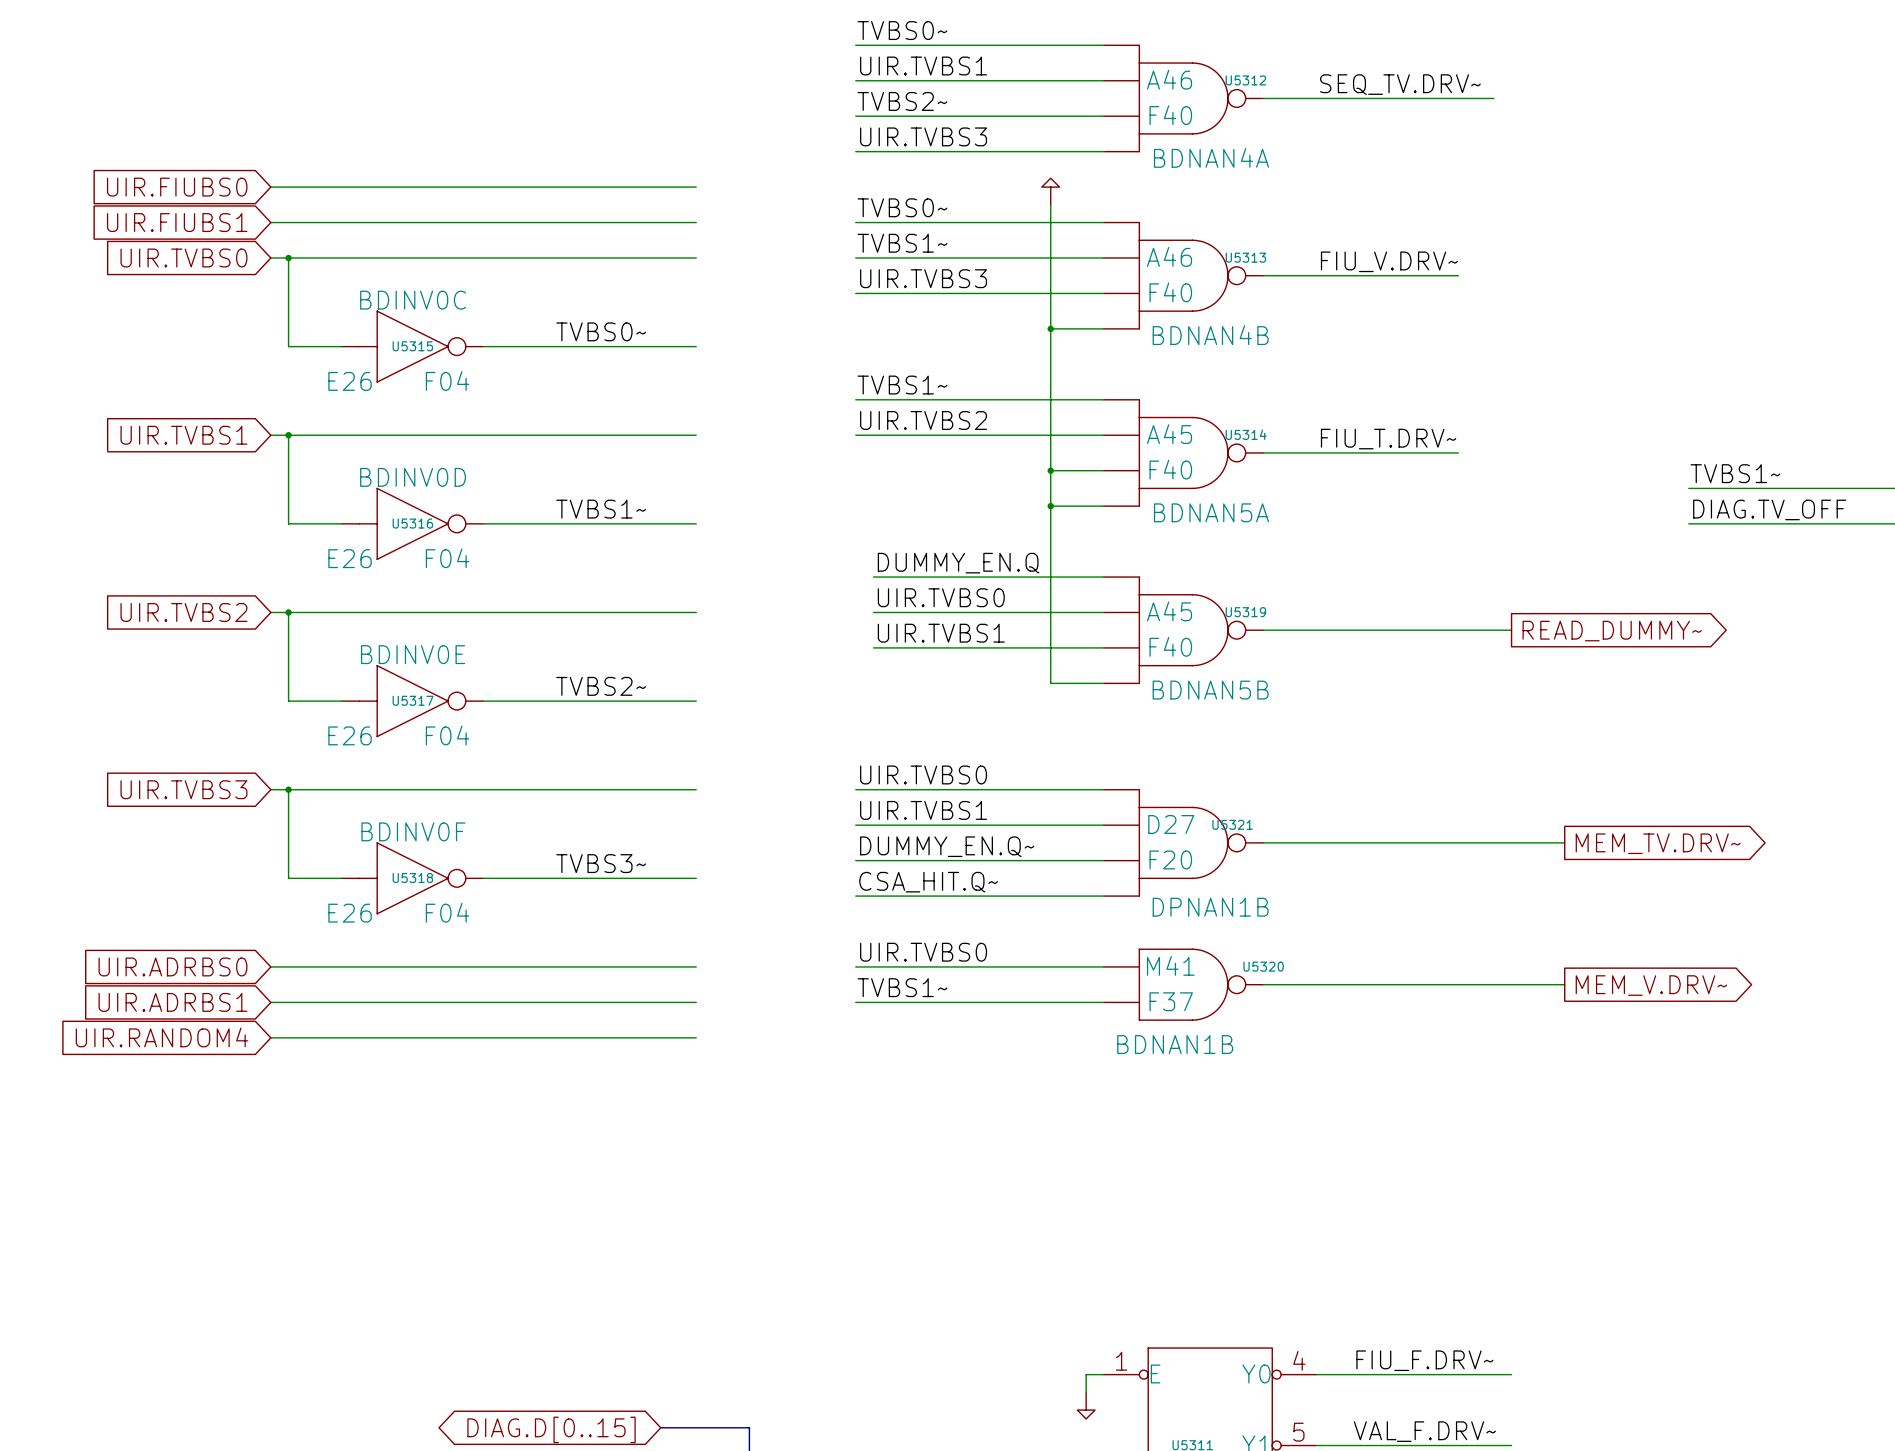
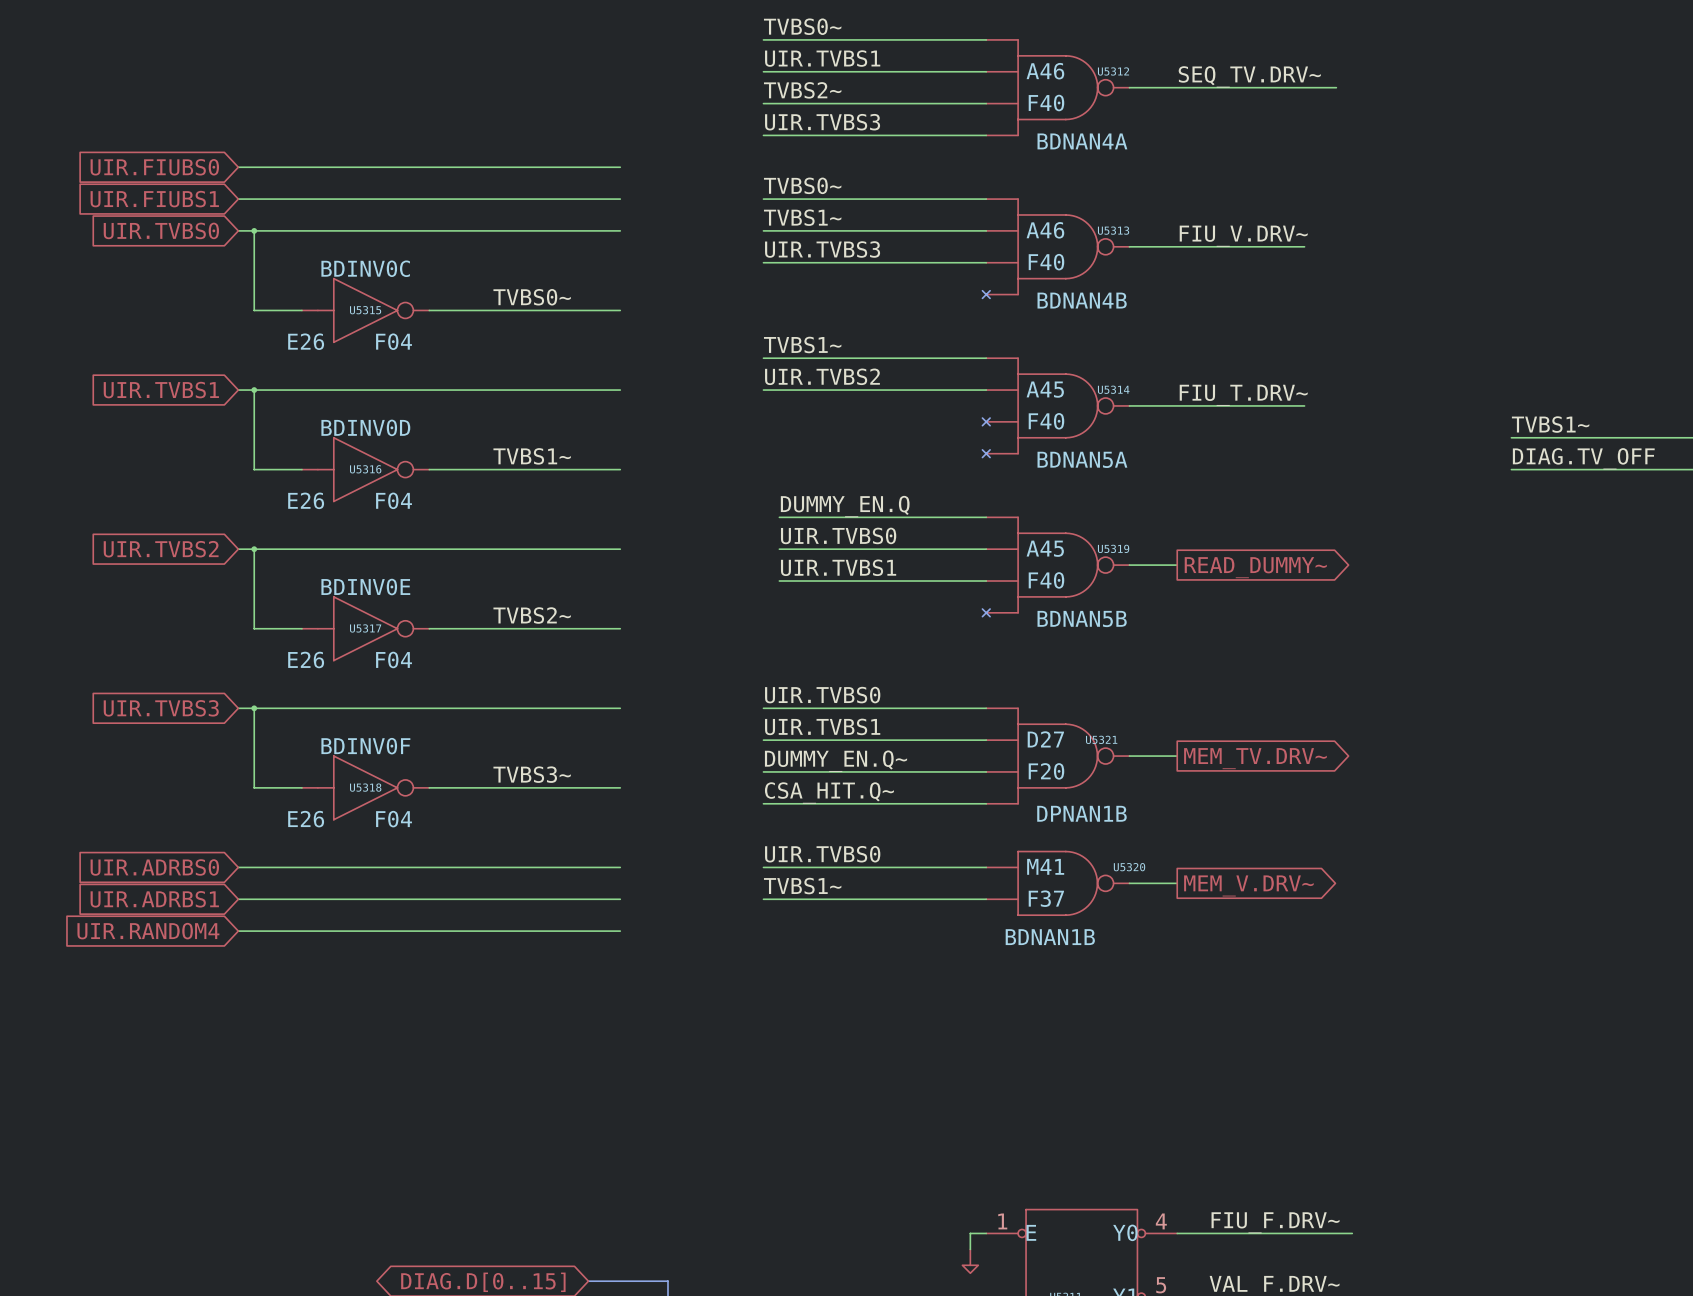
power symbol: (1050, 191) -> none
wire: (1050, 204) (1050, 683) (1103, 683) -> none
wire: (1050, 328) (1103, 328) -> none
junction: (1050, 328) -> none
no-connect mark: none -> (986, 294)
wire: (1050, 470) (1103, 470) -> none
junction: (1050, 470) -> none
no-connect mark: none -> (986, 421)
wire: (1050, 506) (1103, 506) -> none
junction: (1050, 506) -> none
no-connect mark: none -> (986, 453)
wire: (1316, 630) (1511, 630) -> none
global label: none -> READ_DUMMY~ (1255, 567)
global label: READ_DUMMY~ (1612, 631) -> none
no-connect mark: none -> (986, 612)
wire: (1316, 842) (1564, 842) -> none
global label: none -> MEM_TV.DRV~ (1255, 758)
global label: MEM_TV.DRV~ (1658, 843) -> none
wire: (1316, 984) (1564, 984) -> none
global label: none -> MEM_V.DRV~ (1248, 885)
global label: MEM_V.DRV~ (1651, 985) -> none

